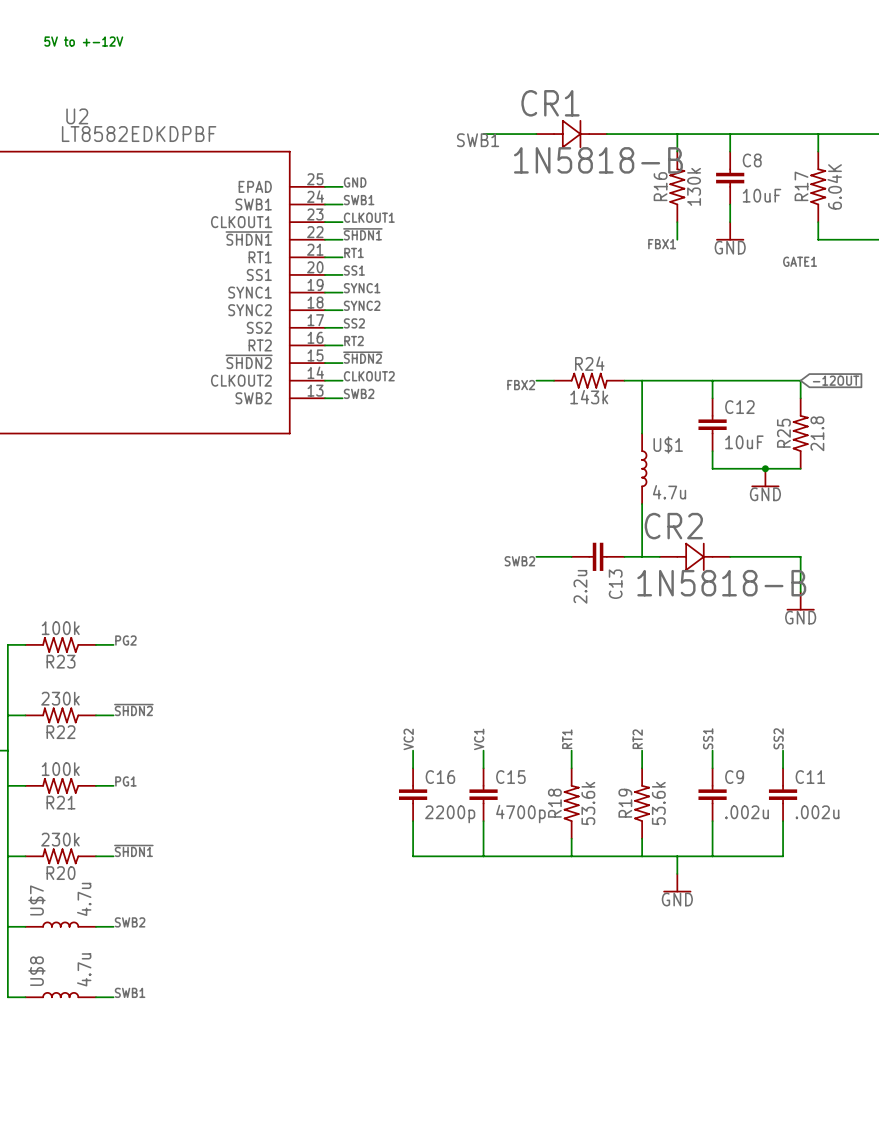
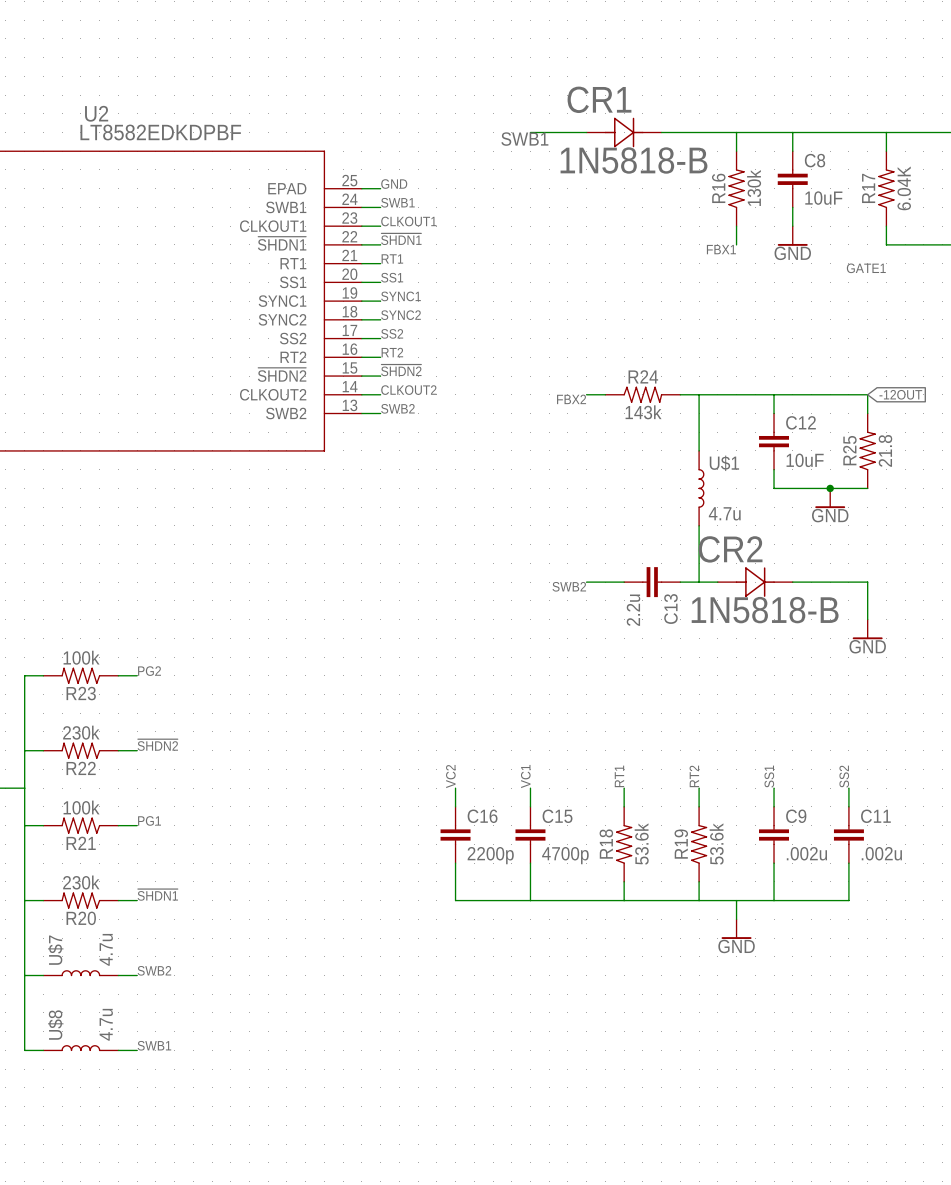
text: 5V to +-12V (83, 41) -> none

